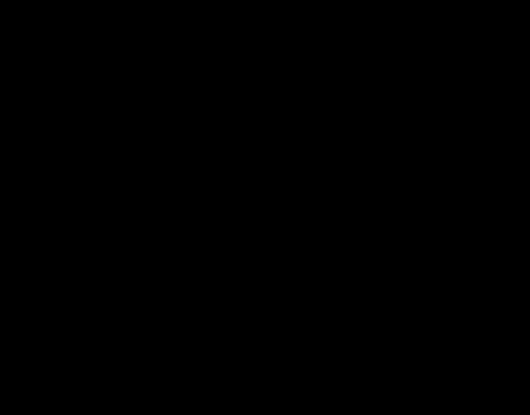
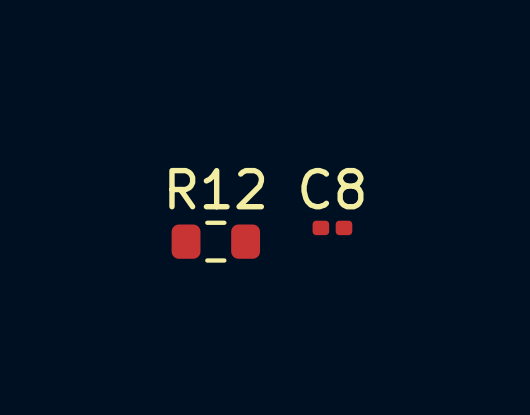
C8: none -> (332, 227)
R12: none -> (215, 241)

